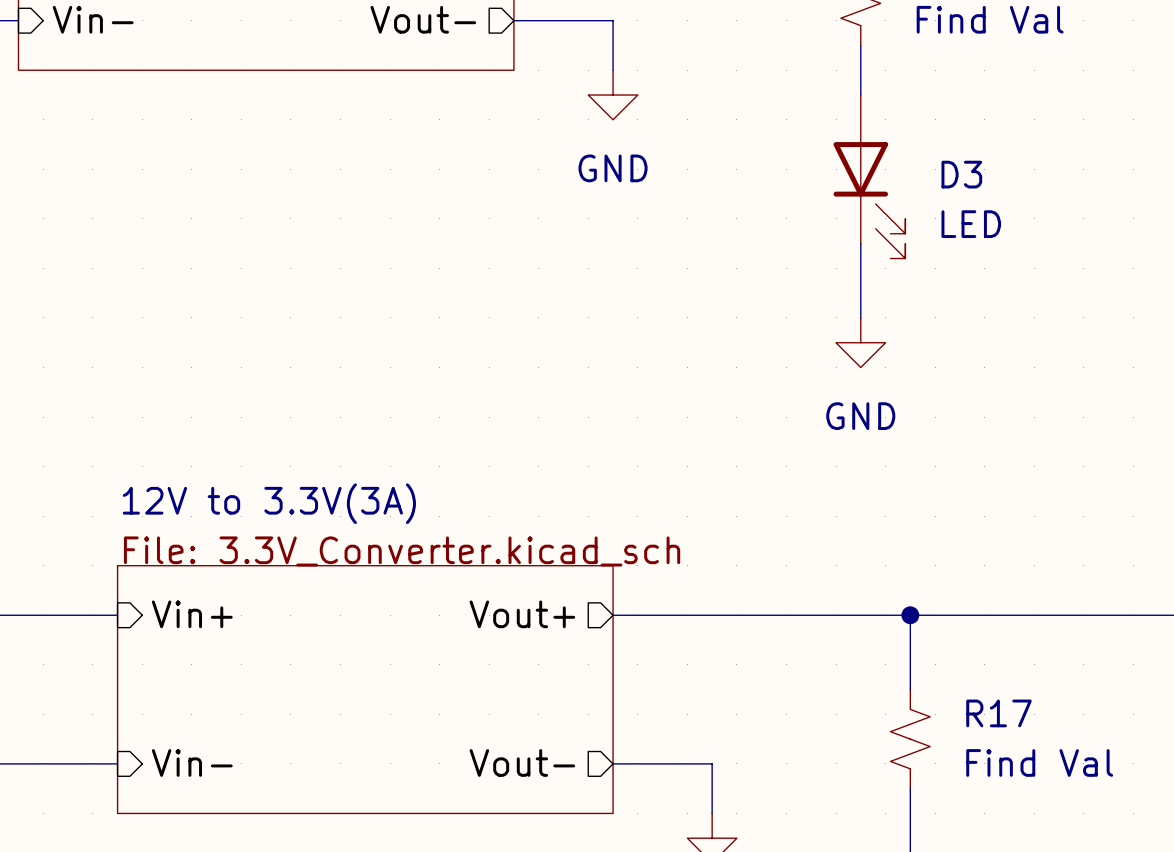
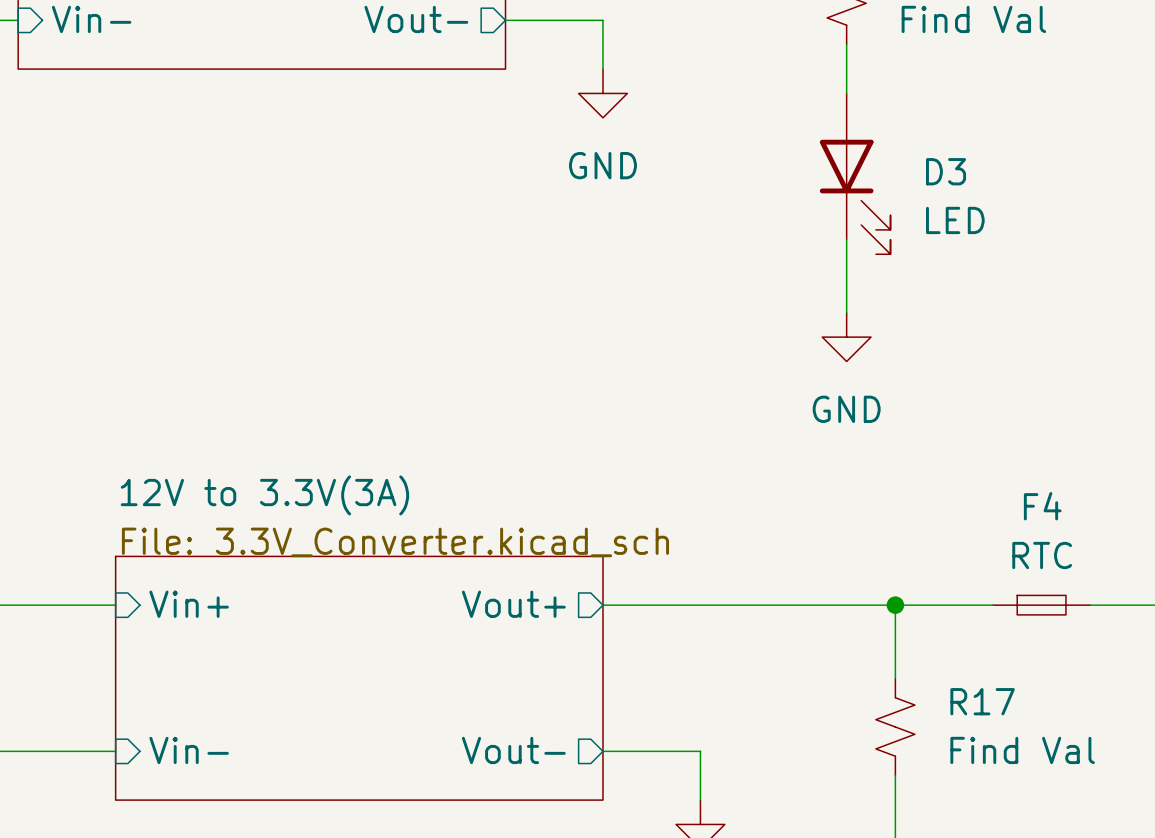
F4: none -> RTC (1041, 605)

